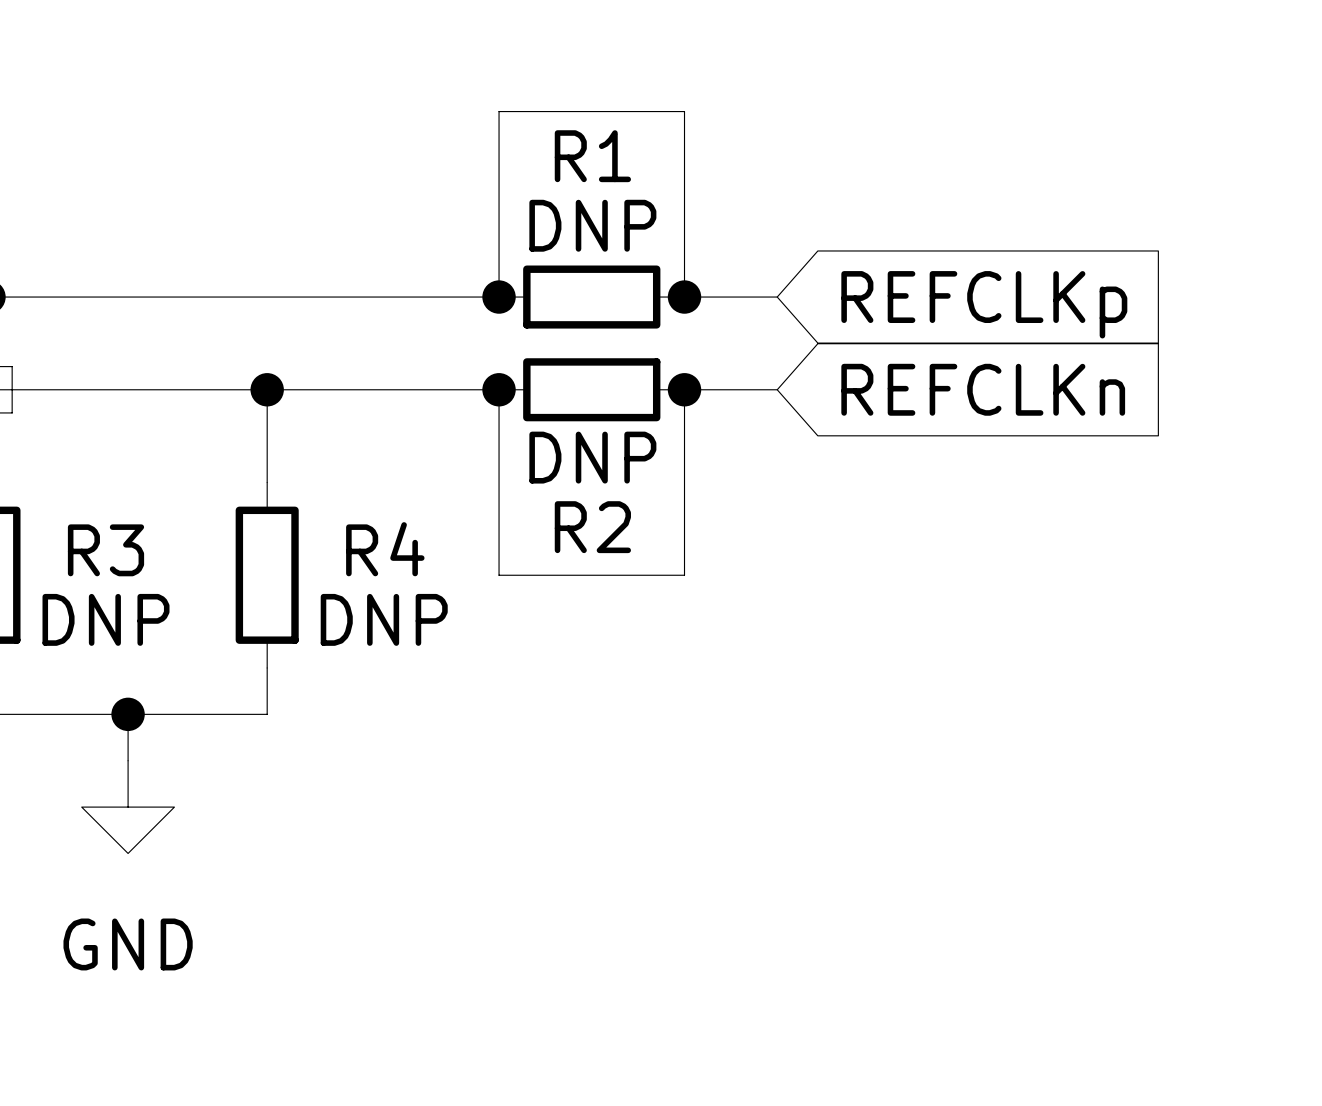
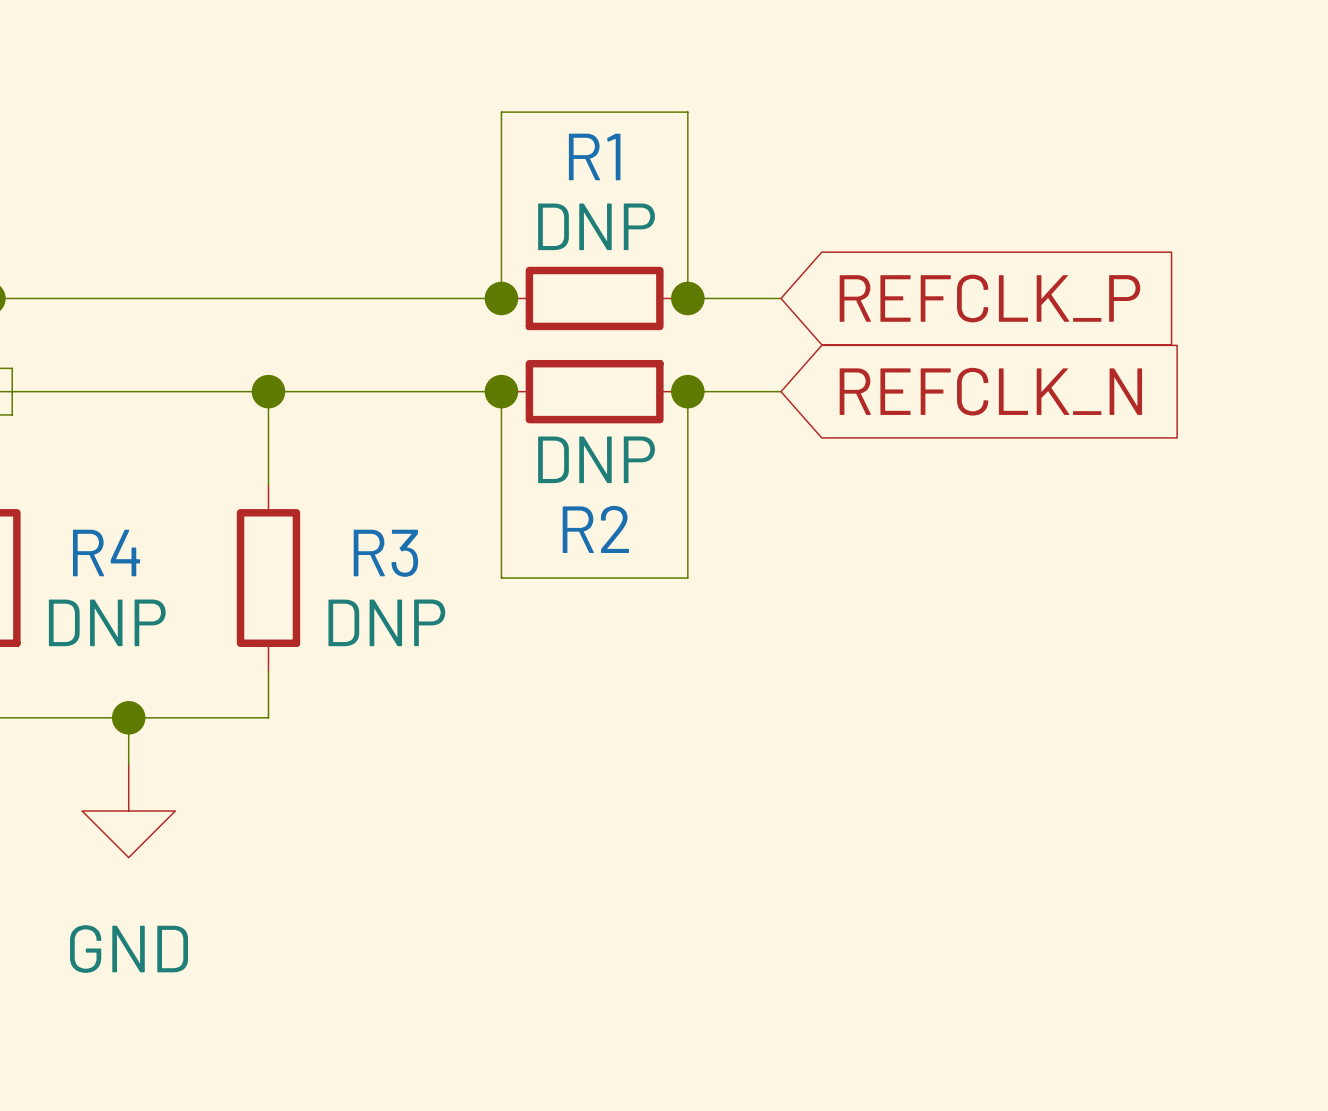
global label: REFCLKp (984, 304) -> REFCLK_P (989, 298)
global label: REFCLKn (983, 389) -> REFCLK_N (990, 391)
R4 name: R4 (385, 549) -> R3 (385, 553)
R3 name: R3 (106, 550) -> R4 (106, 552)

